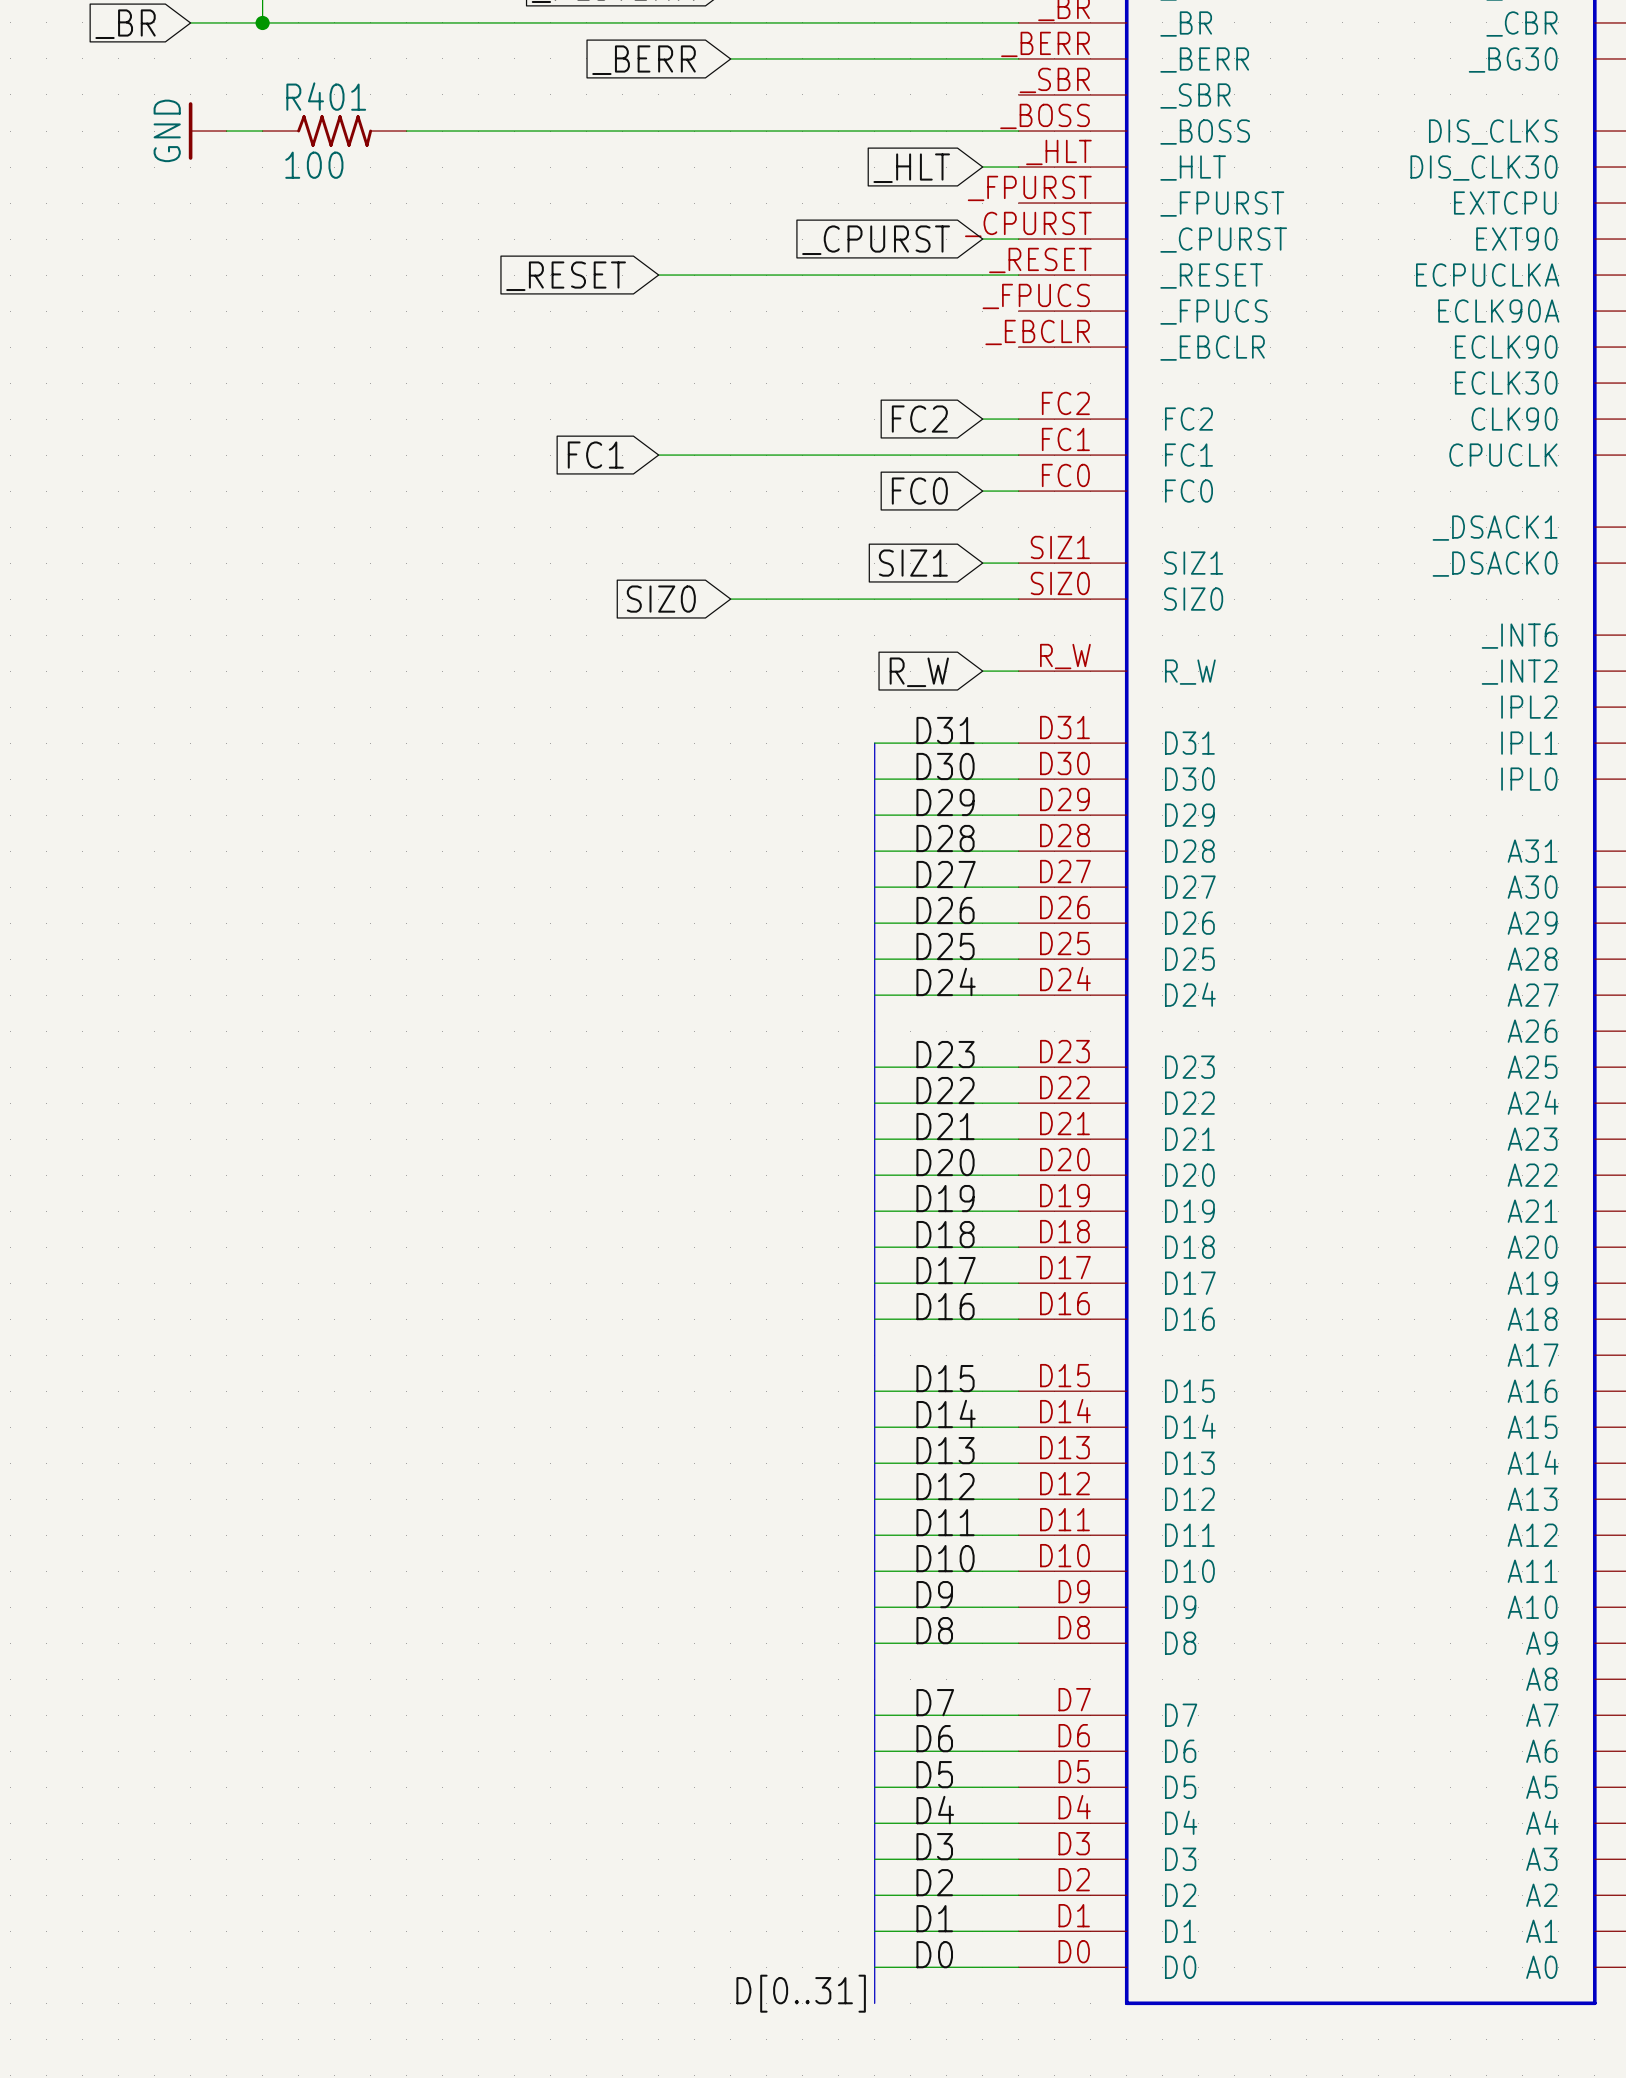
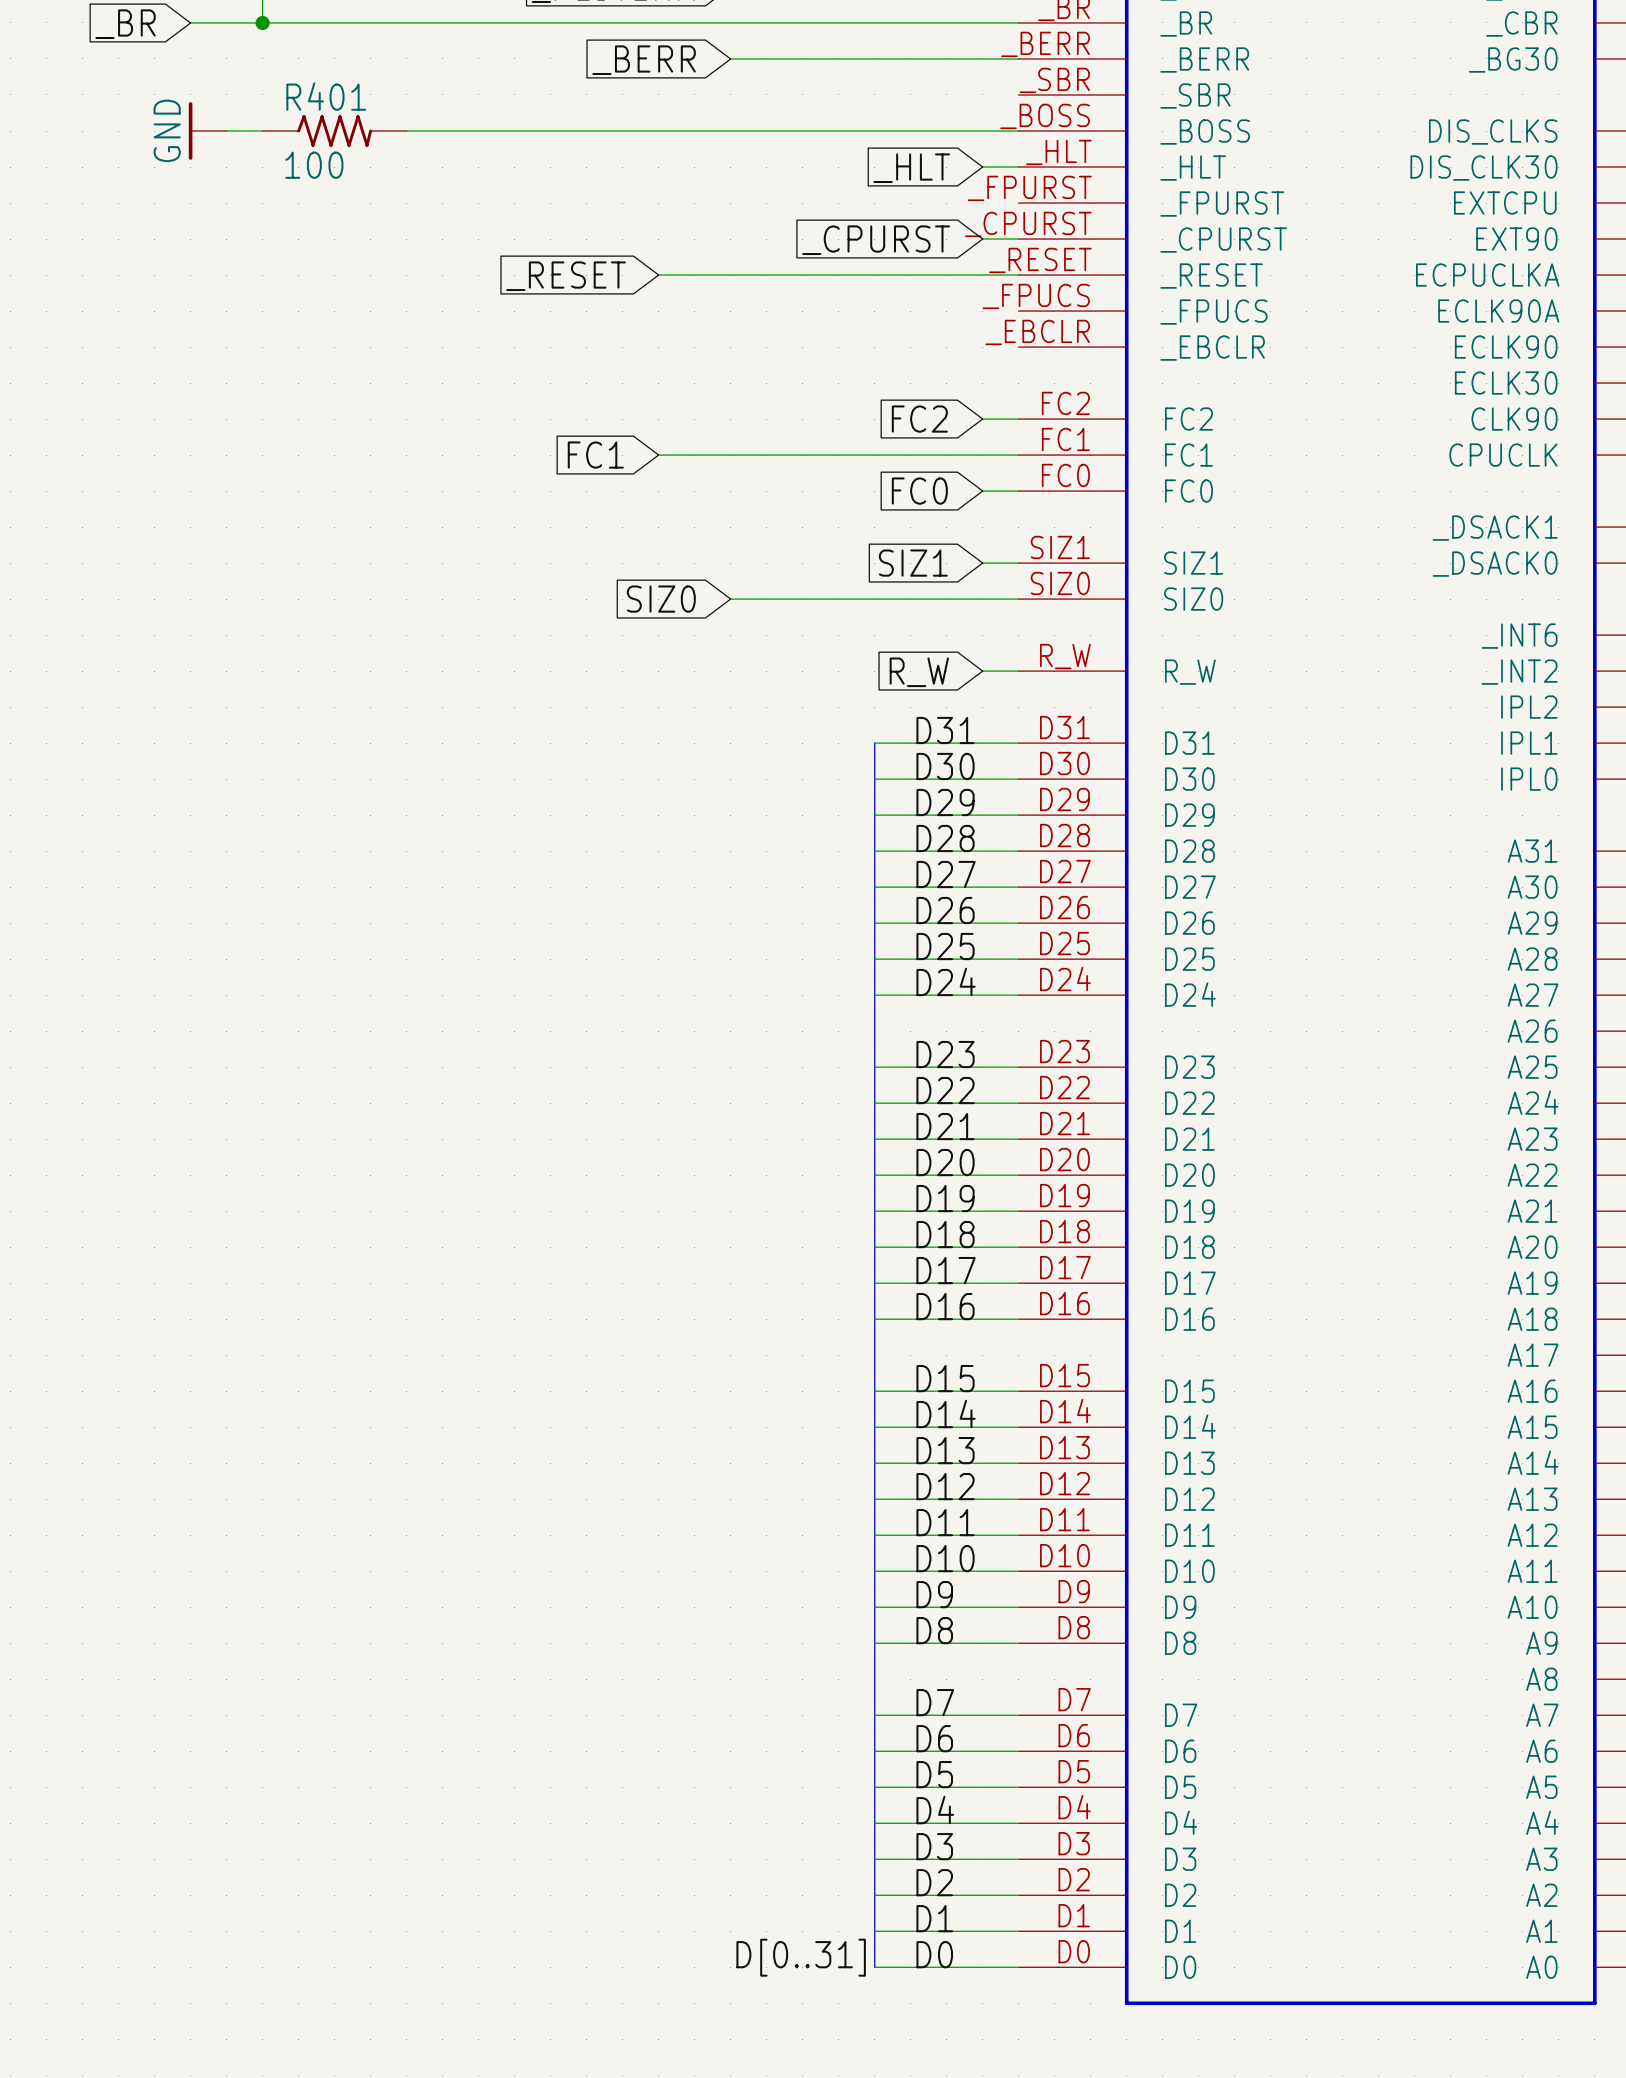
bus: (874, 1967) (874, 2003) -> none
label position: D[0..31] (801, 1993) -> D[0..31] (801, 1957)

